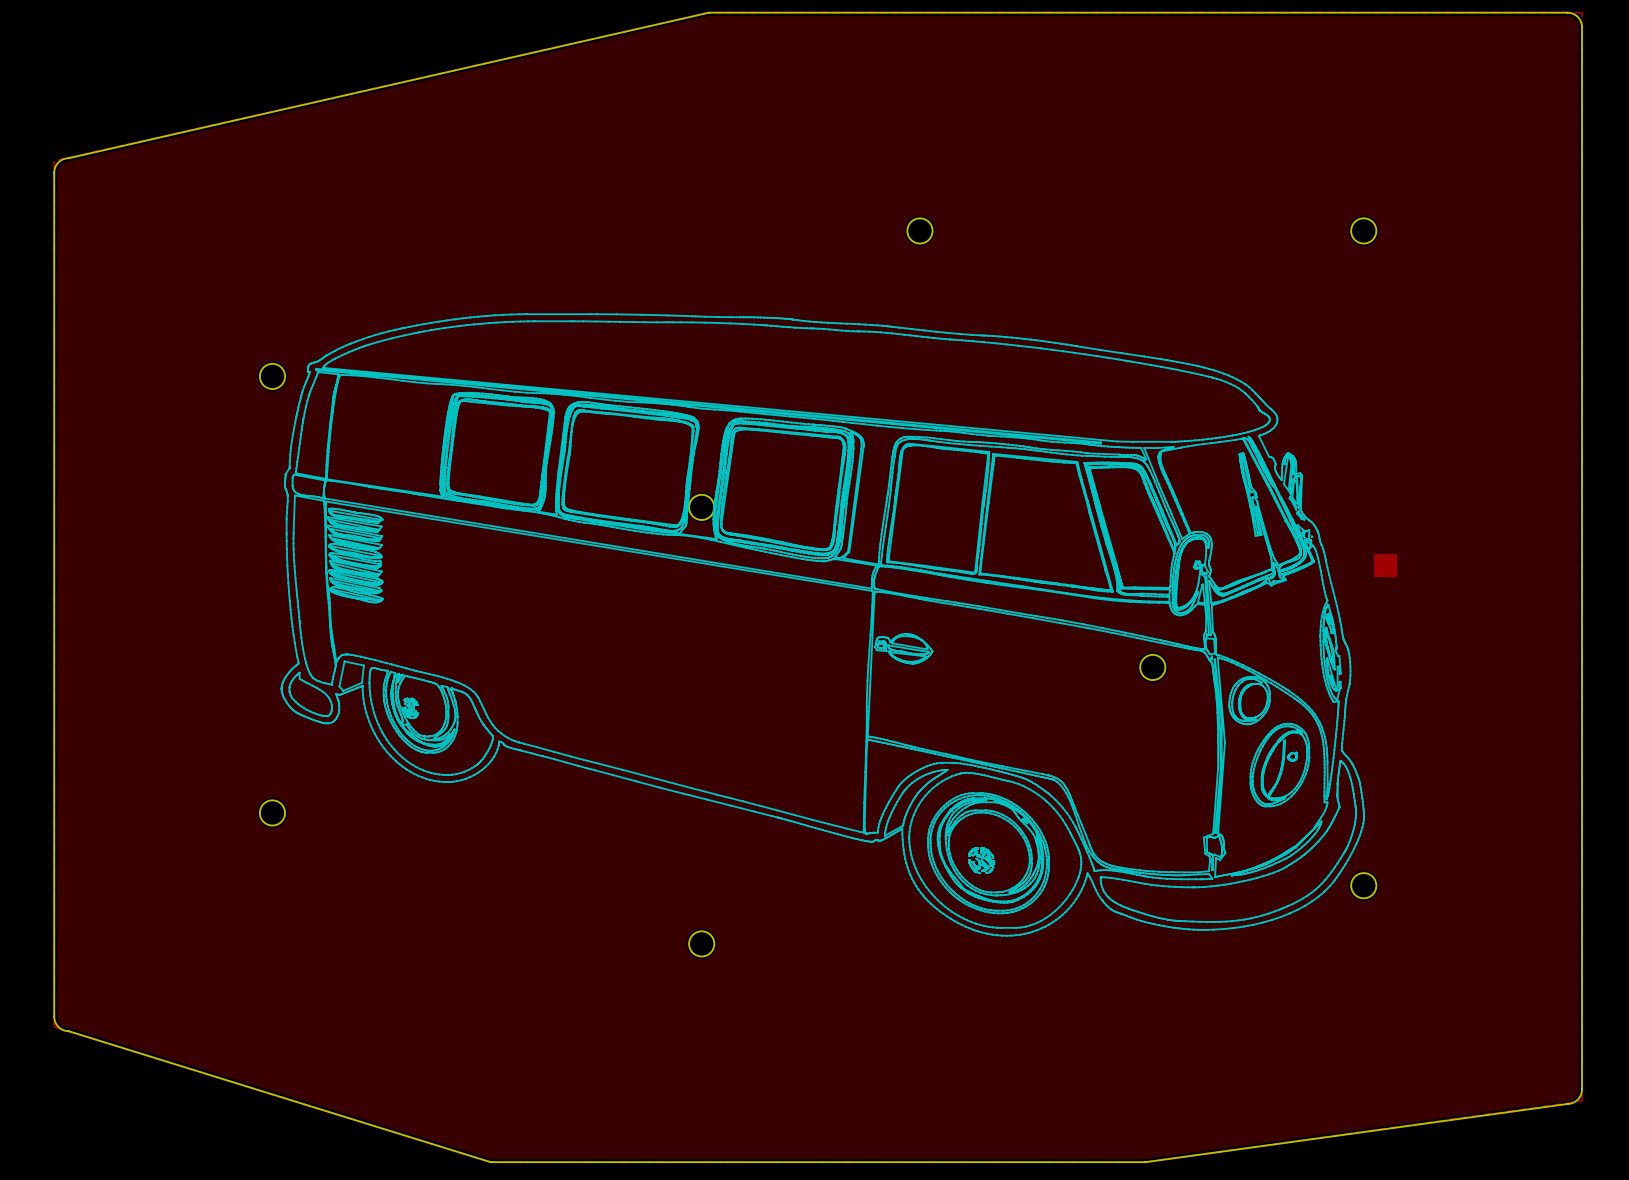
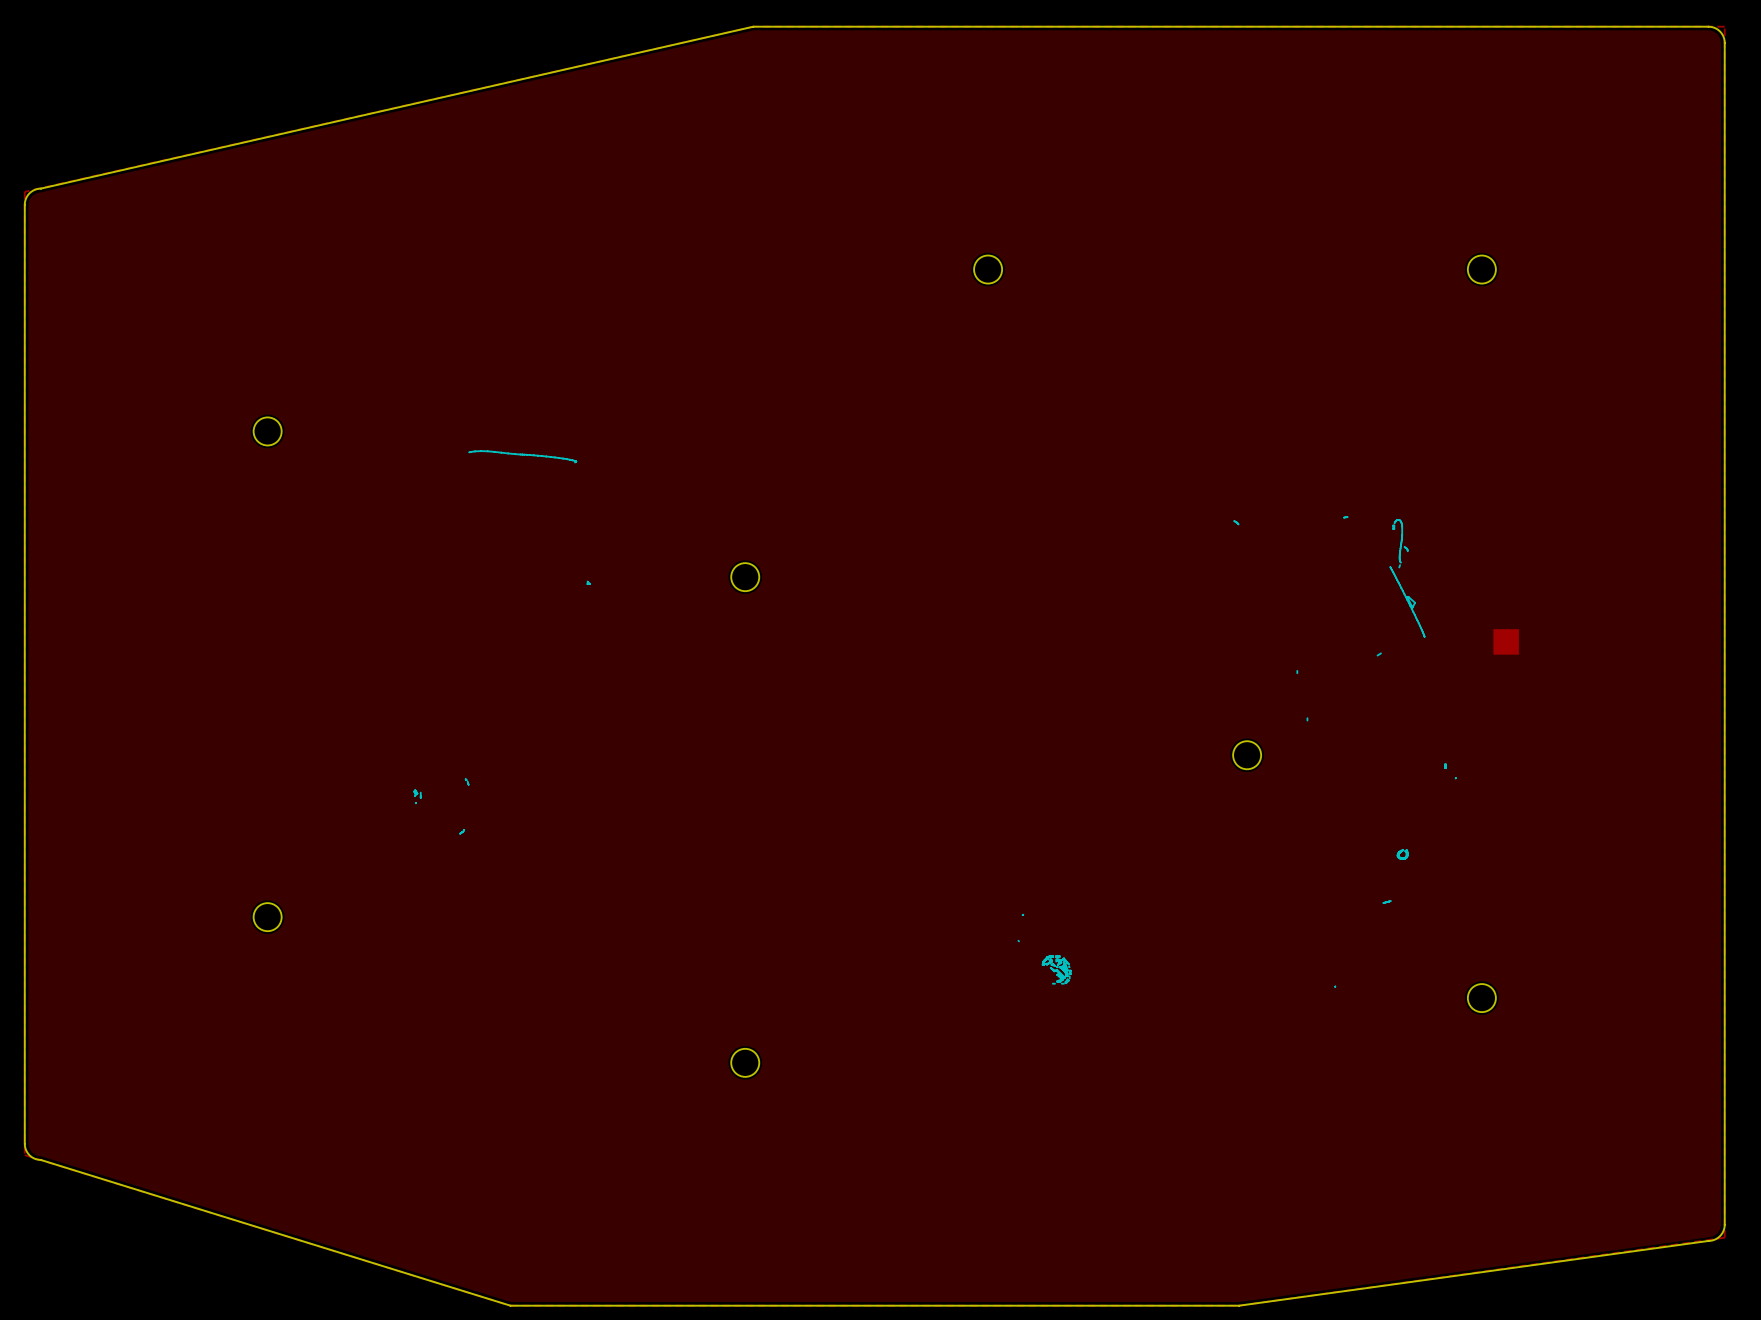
line: (533, 321) (466, 325) (404, 335) (355, 349) (332, 360) (323, 367) (1117, 441) (1175, 441) (1220, 437) (1257, 429) (1266, 424) (1269, 419) (1242, 390) (1221, 380) (1160, 366) (1063, 351) (886, 332) (754, 324) (533, 321) -> none
line: (315, 368) (1100, 443) (315, 368) -> none
line: (453, 395) (448, 411) (443, 447) (440, 482) (442, 496) (326, 479) (332, 411) (340, 374) (1051, 441) (1141, 447) (1145, 460) -> none
line: (466, 399) (538, 406) (550, 410) (541, 497) (537, 504) (509, 503) (453, 493) (448, 491) (447, 474) (456, 407) (459, 400) (466, 399) -> none
line: (461, 400) (455, 422) (448, 488) (459, 493) (528, 504) (535, 503) (539, 496) (550, 411) (535, 407) (461, 400) -> none
line: (544, 402) (458, 395) (452, 408) (447, 446) (443, 484) (447, 495) (455, 498) (531, 510) (446, 498) (441, 489) (445, 440) (453, 394) (474, 392) (540, 399) (550, 404) (553, 412) (546, 466) (545, 494) (538, 511) (556, 514) -> none
line: (578, 405) (673, 414) (688, 418) (694, 421) (648, 413) (578, 406) (574, 407) (570, 413) (567, 427) (559, 487) (558, 511) (559, 485) (567, 417) (570, 409) (573, 406) (578, 405) -> none
line: (580, 409) (575, 412) (572, 422) (563, 491) (563, 508) (570, 511) (670, 526) (679, 524) (685, 507) (692, 425) (672, 419) (580, 409) -> none
line: (581, 411) (576, 414) (572, 425) (564, 490) (564, 507) (570, 509) (599, 514) (675, 525) (678, 524) (684, 506) (692, 427) (678, 421) (581, 411) -> none
line: (694, 418) (670, 412) (588, 402) (577, 402) (571, 405) (565, 416) (556, 487) (556, 514) -> none
line: (694, 418) (696, 428) (685, 512) (680, 528) (668, 530) (561, 513) -> none
line: (739, 422) (832, 430) (842, 433) (848, 437) (850, 448) (840, 532) (836, 547) (830, 553) (824, 555) (804, 552) (726, 539) (719, 535) (716, 523) (727, 439) (731, 426) (739, 422) -> none
line: (735, 423) (731, 430) (727, 445) (718, 513) (719, 534) (727, 538) (811, 552) (825, 553) (832, 551) (836, 541) (846, 465) (848, 442) (846, 436) (835, 432) (735, 423) -> none
line: (738, 427) (839, 436) (843, 440) (845, 451) (834, 538) (830, 548) (821, 550) (803, 547) (729, 534) (722, 530) (721, 510) (731, 436) (734, 430) (738, 427) -> none
line: (845, 428) (752, 418) (737, 418) (729, 423) (741, 419) (744, 421) (830, 428) (843, 431) (849, 434) (850, 453) (840, 537) (835, 551) (829, 557) (808, 557) (738, 544) (723, 539) (716, 534) (714, 530) (716, 506) (728, 424) (723, 441) (714, 507) (713, 526) (716, 539) (679, 533) (686, 524) (692, 461) (698, 427) (694, 418) (677, 414) (592, 405) (572, 405) (566, 420) (556, 500) (559, 512) (567, 517) (652, 530) (677, 532) (596, 521) (561, 513) -> none
line: (845, 428) (860, 436) (863, 446) (848, 552) (861, 443) (858, 436) (850, 432) (853, 438) (853, 453) (844, 527) (840, 547) (834, 558) (841, 557) (848, 552) (843, 558) (878, 564) (893, 452) (895, 443) (901, 437) (926, 437) (1141, 456) -> none
line: (745, 429) (737, 430) (734, 434) (721, 523) (722, 529) (727, 532) (806, 547) (828, 547) (833, 532) (843, 445) (842, 440) (837, 437) (745, 429) -> none
line: (1248, 436) (1274, 487) -> none
line: (1248, 436) (1257, 449) (1281, 498) -> none
line: (909, 443) (989, 451) (975, 573) (886, 562) (900, 455) (903, 446) (909, 443) -> none
line: (1173, 446) (1144, 447) (1182, 538) (1189, 533) (1158, 458) (1160, 451) (1173, 446) -> none
line: (988, 453) (918, 445) (908, 446) (903, 449) (889, 561) (975, 572) (988, 453) -> none
line: (993, 453) (1077, 461) (1112, 591) (979, 574) (993, 453) -> none
line: (1243, 453) (1250, 485) (1256, 495) (1256, 497) (1254, 492) (1250, 492) (1241, 454) (1257, 533) (1259, 533) (1253, 496) (1257, 500) (1270, 548) (1278, 565) (1294, 557) (1300, 552) (1285, 520) -> none
line: (1239, 454) (1243, 476) -> none
line: (994, 455) (980, 573) (1110, 590) (1076, 463) (994, 455) -> none
line: (1288, 456) (1283, 484) (1288, 490) (1291, 464) (1288, 457) -> none
line: (1285, 458) (1287, 455) (1292, 456) (1294, 475) (1301, 477) (1299, 507) (1297, 477) (1293, 480) (1291, 494) -> none
line: (1088, 467) (1120, 466) (1138, 468) (1174, 551) (1174, 542) (1140, 467) (1131, 464) (1086, 464) (1120, 587) (1088, 468) -> none
line: (1119, 467) (1134, 468) (1140, 473) (1174, 553) (1170, 586) (1168, 587) (1122, 587) (1089, 468) (1119, 467) -> none
line: (295, 473) (305, 406) (317, 372) (338, 374) (333, 396) (325, 478) (295, 473) -> none
line: (294, 474) (324, 480) (322, 498) (295, 492) (292, 485) (294, 474) -> none
line: (1243, 477) (1255, 535) (1261, 534) (1255, 506) (1272, 568) (1218, 588) (1209, 576) (1210, 538) (1204, 532) (1190, 532) (1161, 464) (1161, 451) (1242, 438) (1267, 484) (1243, 437) (1245, 438) (1249, 441) (1274, 487) -> none
line: (1294, 480) (1292, 497) (1296, 503) (1297, 484) -> none
line: (1268, 483) (1286, 519) (1285, 520) (1267, 484) (1268, 483) -> none
line: (284, 485) (285, 474) (289, 468) (297, 412) (309, 372) (307, 371) (309, 364) (343, 346) (375, 335) (416, 325) (470, 317) (519, 314) (642, 314) (771, 317) (883, 325) (1030, 339) (1160, 359) (1213, 370) (1232, 377) (1249, 387) (1276, 416) (1277, 422) (1273, 427) (1258, 435) (1269, 456) (1274, 460) (1277, 474) (1282, 480) (1283, 460) (1288, 452) (1295, 459) (1296, 474) (1300, 473) (1302, 475) (1300, 509) (1318, 532) (1343, 637) (1349, 653) (1350, 679) (1345, 701) (1341, 750) (1352, 763) (1358, 779) (1364, 819) (1354, 848) (1333, 881) (1312, 901) (1281, 916) (1243, 926) (1198, 929) (1154, 924) (1114, 911) (1099, 897) (1087, 873) (1076, 899) (1056, 919) (1029, 932) (997, 935) (977, 931) (958, 922) (940, 911) (925, 898) (914, 882) (907, 867) (903, 849) (902, 828) (881, 840) (876, 839) -> none
line: (284, 485) (287, 496) (286, 540) (289, 592) (298, 663) (285, 677) (282, 685) (281, 692) (287, 702) (295, 712) (325, 723) (332, 722) (337, 716) (339, 705) (336, 693) (339, 694) -> none
line: (1274, 486) (1291, 520) (1290, 521) (1274, 486) -> none
line: (294, 495) (294, 560) (303, 653) (307, 668) (312, 677) (332, 684) (335, 665) (331, 637) (326, 585) (323, 500) (294, 495) -> none
line: (324, 498) (326, 480) (331, 480) (539, 512) (574, 521) (640, 531) (701, 537) (802, 558) (823, 561) (836, 559) (876, 565) (872, 575) (871, 588) (325, 498) -> none
line: (1291, 499) (1296, 509) (1295, 504) (1291, 499) -> none
line: (326, 501) (326, 572) (336, 662) (342, 655) (352, 655) (460, 683) (475, 694) (495, 728) (504, 735) (518, 742) (863, 832) (867, 680) (872, 591) (326, 501) -> none
line: (538, 507) (535, 510) (537, 509) (538, 507) (540, 504) (543, 491) (552, 416) (551, 407) (540, 403) (458, 396) (449, 435) (444, 490) (449, 494) (462, 498) (523, 507) (538, 507) -> none
line: (331, 508) (373, 514) (382, 519) (376, 522) (337, 516) (330, 513) (329, 509) (331, 508) -> none
line: (330, 510) (333, 514) (379, 521) (379, 519) (330, 510) -> none
line: (1299, 510) (1299, 515) (1297, 513) (1299, 510) -> none
line: (1300, 514) (1304, 519) (1301, 518) (1300, 514) -> none
line: (328, 517) (381, 526) (376, 531) (340, 526) (330, 522) (328, 517) -> none
line: (330, 519) (343, 525) (379, 529) (330, 519) -> none
line: (1286, 519) (1298, 541) (1301, 553) (1297, 558) (1281, 565) (1278, 570) (1296, 564) (1303, 556) (1302, 545) (1291, 520) (1300, 537) (1305, 554) (1300, 562) (1279, 571) (1279, 574) (1312, 561) -> none
line: (1171, 521) (1148, 467) (1137, 458) (1077, 455) (907, 439) (899, 442) (896, 449) (880, 565) (1093, 596) (1169, 601) (1169, 596) (1127, 595) (1116, 590) (1115, 572) (1084, 463) (1131, 463) (1140, 466) (1149, 480) (1176, 545) -> none
line: (1171, 521) (1179, 540) (1176, 544) -> none
line: (328, 525) (381, 536) (376, 541) (339, 535) (331, 532) (328, 525) -> none
line: (331, 528) (340, 534) (371, 539) (379, 538) (331, 528) -> none
line: (1305, 531) (1309, 529) (1307, 540) (1303, 535) (1304, 531) -> none
line: (329, 534) (381, 544) (377, 548) (366, 548) (336, 541) (329, 534) -> none
line: (331, 538) (348, 543) (378, 548) (331, 538) -> none
line: (1196, 539) (1187, 542) (1180, 554) (1176, 589) (1177, 607) (1188, 603) (1195, 592) (1200, 568) (1196, 569) (1193, 567) (1195, 561) (1199, 561) (1200, 565) (1204, 564) (1205, 543) (1203, 539) (1196, 539) -> none
line: (1309, 540) (1311, 543) (1311, 540) (1309, 540) -> none
line: (330, 545) (379, 555) (371, 557) (340, 551) (330, 545) -> none
line: (1207, 548) (1208, 546) (1208, 539) (1201, 534) (1188, 537) (1179, 547) (1174, 563) (1172, 583) (1172, 605) (1176, 612) (1181, 612) (1188, 610) (1196, 594) (1183, 608) (1177, 609) (1174, 607) (1175, 573) (1181, 550) (1187, 541) (1196, 537) (1204, 538) (1206, 548) -> none
line: (330, 553) (380, 561) (381, 565) (376, 568) (335, 560) (329, 556) (330, 553) -> none
line: (381, 557) (350, 554) (335, 550) (329, 545) (335, 544) (370, 550) (378, 553) (381, 557) -> none
line: (330, 560) (381, 571) (376, 576) (340, 570) (332, 566) (330, 560) -> none
line: (1197, 562) (1200, 566) (1204, 565) (1207, 572) (1204, 573) (1201, 571) (1201, 567) (1195, 567) (1197, 562) -> none
line: (332, 563) (348, 570) (379, 574) (332, 563) -> none
line: (1273, 563) (1274, 574) (1268, 578) (1270, 584) (1273, 580) (1284, 578) (1279, 577) (1277, 567) (1273, 563) -> none
line: (379, 564) (331, 555) (359, 564) (377, 566) (379, 564) -> none
line: (878, 566) (1102, 599) (1169, 602) (1173, 612) (1179, 615) (1187, 612) (1197, 603) (1204, 605) (1205, 649) (1062, 620) (874, 588) (874, 579) (878, 566) -> none
line: (332, 572) (379, 581) (379, 583) (349, 578) (336, 574) (333, 572) (332, 572) (332, 572) -> none
line: (1202, 573) (1205, 577) (1209, 635) (1211, 635) (1206, 574) (1202, 573) -> none
line: (334, 576) (329, 570) (382, 580) (381, 583) (376, 585) -> none
line: (334, 576) (376, 585) -> none
line: (330, 577) (379, 588) (381, 590) (371, 593) (341, 586) (333, 583) (330, 577) -> none
line: (1267, 577) (1256, 586) (1222, 600) (1211, 602) (1209, 580) (1216, 593) (1223, 595) (1267, 577) -> none
line: (332, 580) (379, 590) (376, 592) (339, 584) (332, 580) -> none
line: (1266, 582) (1212, 604) -> none
line: (1266, 582) (1271, 585) (1274, 582) (1286, 580) (1282, 575) (1312, 562) (1314, 561) (1305, 539) (1310, 544) (1308, 549) (1312, 545) (1313, 546) (1327, 600) (1322, 612) (1320, 626) (1322, 668) (1330, 696) (1333, 702) (1338, 701) (1332, 762) (1326, 799) -> none
line: (1202, 584) (1204, 602) (1197, 602) (1202, 584) -> none
line: (1215, 586) (1214, 588) (1216, 590) (1224, 593) (1273, 572) (1269, 570) (1221, 589) (1217, 589) (1215, 586) -> none
line: (332, 587) (342, 588) (382, 598) (378, 602) (367, 601) (334, 593) (330, 589) (332, 587) -> none
line: (1118, 588) (1121, 592) (1129, 594) (1169, 594) (1170, 589) (1118, 588) -> none
line: (332, 589) (380, 600) (350, 595) (332, 589) -> none
line: (1212, 604) (1216, 654) (1243, 665) (1282, 686) (1305, 703) (1317, 717) (1323, 731) (1326, 748) (1326, 799) -> none
line: (1329, 614) (1328, 615) (1330, 624) (1329, 614) -> none
line: (1326, 628) (1333, 650) (1334, 669) -> none
line: (1326, 628) (1324, 630) (1325, 641) (1334, 669) -> none
line: (1325, 632) (1328, 648) (1333, 662) (1330, 645) (1325, 632) -> none
line: (904, 633) (913, 635) (921, 639) (932, 650) (931, 653) (922, 661) (909, 663) (896, 659) (889, 651) (876, 650) (875, 647) (878, 637) (887, 637) (890, 642) (895, 637) (904, 633) -> none
line: (901, 636) (895, 638) (892, 643) (927, 649) (925, 643) (919, 638) (901, 636) -> none
line: (1205, 638) (1206, 649) (1210, 654) (1215, 653) (1214, 638) (1205, 638) -> none
line: (878, 644) (882, 643) (883, 647) (878, 647) (877, 644) -> none
line: (888, 645) (892, 650) (911, 653) (924, 654) (929, 652) (888, 645) -> none
line: (884, 649) (884, 642) (878, 641) (885, 641) (885, 649) (883, 649) -> none
line: (1335, 650) (1335, 634) (1330, 613) (1333, 633) (1331, 633) (1326, 618) (1330, 612) (1328, 604) (1323, 620) (1324, 657) (1329, 687) (1337, 700) (1339, 689) (1337, 689) (1337, 666) (1339, 666) (1340, 673) (1339, 655) (1335, 650) -> none
line: (890, 651) (890, 652) (895, 657) (906, 661) (917, 661) (926, 656) (890, 651) -> none
line: (1212, 656) (1212, 659) (1210, 659) (1212, 656) -> none
line: (1327, 658) (1336, 690) (1329, 679) (1327, 658) -> none
line: (1214, 659) (1220, 730) (1220, 769) (1216, 832) (1221, 769) (1221, 722) (1214, 659) -> none
line: (344, 661) (339, 686) (343, 690) (361, 682) (363, 665) (344, 661) -> none
line: (1211, 662) (1204, 652) (1199, 650) (1059, 622) (874, 591) (867, 736) (1056, 778) (1067, 790) (1092, 852) (1098, 859) (1107, 864) (1153, 871) (1208, 871) (1209, 856) (1205, 853) (1203, 837) (1213, 833) (1218, 767) (1216, 704) (1211, 662) -> none
line: (299, 672) (289, 685) (292, 697) (310, 711) (322, 715) (329, 715) (332, 707) (328, 697) (320, 690) (299, 678) (299, 672) -> none
line: (402, 674) (398, 676) (398, 681) (402, 674) (402, 674) -> none
line: (1251, 676) (1260, 678) (1267, 684) (1269, 702) (1261, 717) (1253, 723) (1245, 724) (1238, 721) (1232, 715) (1229, 708) (1229, 698) (1237, 682) (1243, 678) (1251, 676) -> none
line: (1250, 678) (1238, 684) (1232, 698) (1234, 715) (1244, 721) (1255, 719) (1247, 719) (1240, 713) (1238, 703) (1241, 692) (1247, 685) (1261, 682) (1250, 678) -> none
line: (1331, 679) (1333, 684) (1332, 679) (1331, 679) -> none
line: (1339, 681) (1339, 685) (1340, 685) (1340, 681) (1339, 681) -> none
line: (436, 683) (404, 675) (398, 688) (398, 699) (404, 717) (413, 729) (422, 736) (430, 736) (437, 733) (445, 721) (445, 701) (440, 689) (436, 683) -> none
line: (1256, 683) (1246, 688) (1240, 697) (1240, 710) (1247, 718) (1260, 714) (1267, 703) (1266, 689) (1261, 684) (1256, 683) -> none
line: (362, 685) (367, 716) (381, 744) (403, 766) (426, 778) (452, 781) (474, 774) (491, 760) (499, 741) (510, 747) (844, 836) (869, 841) (875, 839) -> none
line: (362, 685) (339, 694) -> none
line: (441, 685) (447, 701) (448, 721) (444, 730) (433, 739) (447, 733) (455, 719) (454, 706) (447, 687) (441, 685) -> none
line: (450, 688) (463, 692) (468, 696) (483, 724) -> none
line: (453, 694) (457, 716) (457, 728) (453, 738) (447, 747) (440, 751) (421, 751) (411, 746) (402, 738) (388, 716) (383, 695) (387, 670) (373, 667) (370, 671) (371, 700) (380, 728) (397, 752) (416, 767) (443, 774) (464, 771) (482, 759) (490, 745) (493, 736) -> none
line: (413, 699) (416, 702) (416, 702) (412, 699) (413, 699) -> none
line: (410, 701) (413, 703) (413, 709) (409, 708) (411, 713) (410, 709) (414, 710) (414, 705) (416, 705) (409, 700) (407, 705) (411, 706) -> none
line: (418, 704) (417, 705) -> none
line: (405, 707) (409, 712) (405, 711) (407, 715) (408, 713) (411, 714) (409, 717) (411, 718) (407, 716) (405, 714) (402, 707) (405, 707) -> none
line: (416, 711) (415, 714) (412, 715) (416, 711) -> none
line: (418, 713) (416, 716) (413, 718) (415, 715) (418, 713) -> none
line: (402, 723) (395, 697) (396, 683) (398, 673) (394, 679) (392, 695) (395, 712) (401, 723) -> none
line: (1287, 723) (1298, 726) (1307, 736) (1309, 746) (1307, 769) (1299, 786) (1287, 799) (1277, 805) (1262, 805) (1255, 799) (1251, 788) (1252, 763) (1259, 747) (1268, 734) (1277, 726) (1287, 723) -> none
line: (483, 724) (492, 736) -> none
line: (404, 729) (420, 741) (429, 744) (441, 743) (448, 738) (449, 734) -> none
line: (404, 729) (417, 740) (434, 746) (446, 742) (454, 729) (447, 742) (435, 750) (422, 749) (407, 740) (395, 725) (387, 706) (386, 686) (390, 671) (394, 672) (391, 692) (393, 708) (398, 722) (404, 729) -> none
line: (404, 729) (402, 725) (406, 724) (413, 733) (424, 739) (437, 740) (445, 738) -> none
line: (1301, 733) (1297, 731) (1288, 732) (1276, 743) -> none
line: (1301, 733) (1299, 730) (1291, 726) (1282, 726) (1276, 729) (1265, 742) (1255, 764) (1252, 782) (1258, 799) (1268, 804) (1279, 801) (1284, 797) -> none
line: (867, 739) (865, 833) (877, 832) (880, 820) (887, 804) (898, 786) (908, 776) (933, 764) (960, 763) (1021, 777) (1048, 793) (1063, 808) (1073, 822) (1094, 871) (1112, 870) (1166, 878) (1212, 878) (1208, 873) (1153, 874) (1112, 868) (1101, 864) (1093, 857) (1087, 846) (1066, 793) (1053, 779) -> none
line: (867, 739) (1053, 779) -> none
line: (1276, 743) (1267, 759) (1263, 773) (1262, 784) (1266, 796) -> none
line: (1276, 743) (1268, 755) (1262, 773) (1261, 788) (1266, 796) -> none
line: (1276, 743) (1288, 733) (1295, 732) (1300, 734) (1306, 744) (1306, 763) (1300, 779) (1291, 791) (1279, 797) (1266, 796) -> none
line: (1340, 760) (1345, 766) (1350, 777) (1355, 809) (1353, 831) (1344, 852) -> none
line: (1340, 760) (1337, 783) -> none
line: (946, 769) (925, 774) (907, 786) (892, 811) (884, 835) (903, 825) (908, 809) (918, 793) (928, 782) (946, 769) -> none
line: (966, 772) (951, 776) (937, 784) (925, 795) (915, 809) (910, 826) (909, 842) (912, 859) (919, 875) (928, 890) (941, 903) (955, 914) (971, 922) (992, 927) (1015, 927) (1041, 920) (1063, 903) (1077, 881) (1081, 861) (1075, 842) (1056, 812) (1033, 791) (1013, 782) (966, 772) -> none
line: (1337, 784) (1339, 807) (1326, 831) (1305, 853) (1278, 870) (1244, 881) (1199, 887) (1156, 885) (1105, 877) (1100, 877) (1100, 880) (1104, 891) (1111, 899) (1123, 906) (1148, 915) (1175, 920) (1238, 920) (1274, 911) (1307, 895) (1325, 879) (1344, 852) -> none
line: (1273, 787) (1281, 768) (1285, 740) (1281, 773) (1269, 795) (1273, 787) -> none
line: (972, 793) (992, 794) (1013, 803) (1031, 819) (1044, 838) (1049, 859) (1046, 882) (1035, 899) (1019, 909) (1007, 912) (993, 913) (968, 905) (948, 890) (933, 867) (927, 842) (929, 829) (933, 818) (950, 800) (961, 795) (972, 793) -> none
line: (976, 795) (955, 800) (938, 815) (930, 836) (933, 861) (946, 884) (967, 901) (991, 910) (1016, 908) (1031, 899) (1043, 881) (1046, 862) (1043, 843) (1034, 826) (1017, 809) (997, 798) (976, 795) -> none
line: (1266, 796) (1274, 800) -> none
line: (980, 802) (996, 802) (1009, 807) (1035, 838) (1038, 854) (1037, 865) (1029, 880) (1017, 890) (1009, 892) (1027, 878) (1031, 869) (1031, 857) (1025, 837) (1013, 822) (993, 811) (973, 810) (960, 816) (947, 832) (951, 822) (959, 812) (970, 805) (980, 802) -> none
line: (951, 810) (939, 827) (938, 845) (948, 871) (957, 884) (963, 889) -> none
line: (949, 812) (940, 828) (940, 850) (946, 866) (963, 889) -> none
line: (980, 812) (963, 817) (952, 828) (948, 841) (950, 857) (959, 873) (976, 888) (990, 892) (1005, 890) (1019, 882) (1027, 872) (1029, 860) (1027, 846) (1021, 834) (1007, 820) (995, 814) (980, 812) -> none
line: (1023, 818) (1027, 822) (1026, 823) (1022, 819) (1023, 818) -> none
line: (1314, 828) (1294, 846) (1295, 847) (1314, 828) -> none
line: (1215, 837) (1219, 835) (1221, 843) (1222, 853) (1220, 856) (1214, 854) (1213, 856) (1207, 851) (1206, 837) (1215, 837) -> none
line: (1212, 859) (1212, 870) (1213, 870) (1213, 859) (1212, 859) -> none
line: (969, 860) (969, 863) (970, 863) (970, 860) (969, 860) -> none
line: (972, 862) (974, 862) (974, 865) (972, 862) -> none
line: (975, 865) (979, 868) (980, 863) (979, 868) (975, 865) -> none
line: (976, 872) (970, 864) (976, 872) -> none
line: (1215, 877) (1257, 866) (1295, 846) (1267, 863) (1234, 875) (1258, 870) (1291, 855) (1316, 831) (1321, 821) (1314, 828) (1325, 810) (1327, 802) (1324, 802) (1322, 739) (1318, 725) (1311, 713) (1298, 701) (1270, 683) (1242, 667) (1217, 657) (1224, 742) (1218, 833) (1222, 837) (1225, 853) (1220, 860) (1216, 857) (1215, 877) -> none
line: (963, 889) (990, 900) (1008, 901) (1024, 894) (1038, 878) (1041, 856) (1036, 837) (1039, 859) (1036, 874) (1027, 886) (1013, 893) (994, 895) (975, 890) (963, 881) (951, 864) (945, 839) (950, 817) (962, 805) (986, 799) (968, 800) (952, 808) (961, 801) (972, 798) (990, 798) (1005, 804) (1025, 818) (1038, 837) (1043, 859) (1039, 879) (1028, 893) (1010, 902) (985, 900) (972, 895) (963, 889) -> none

